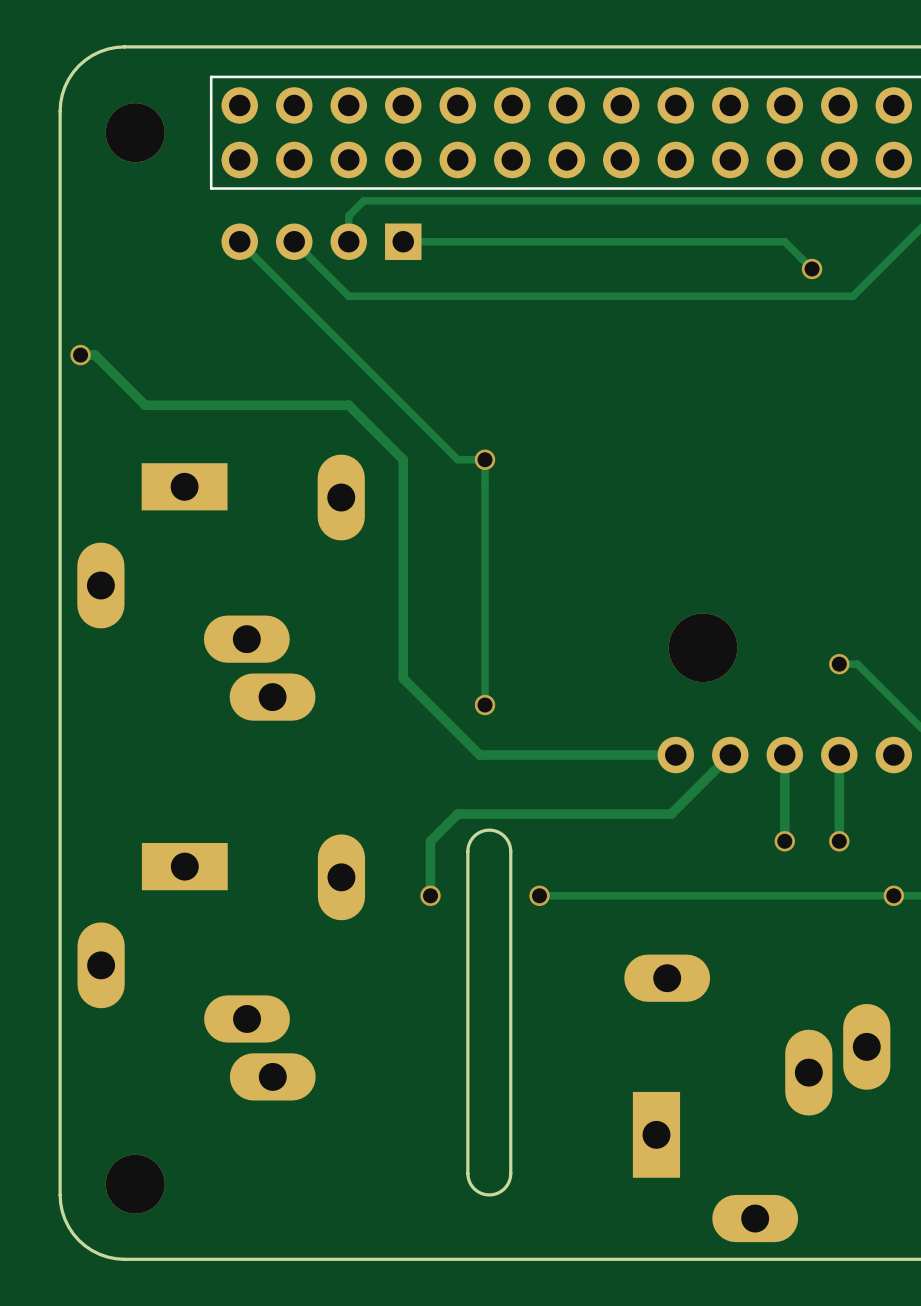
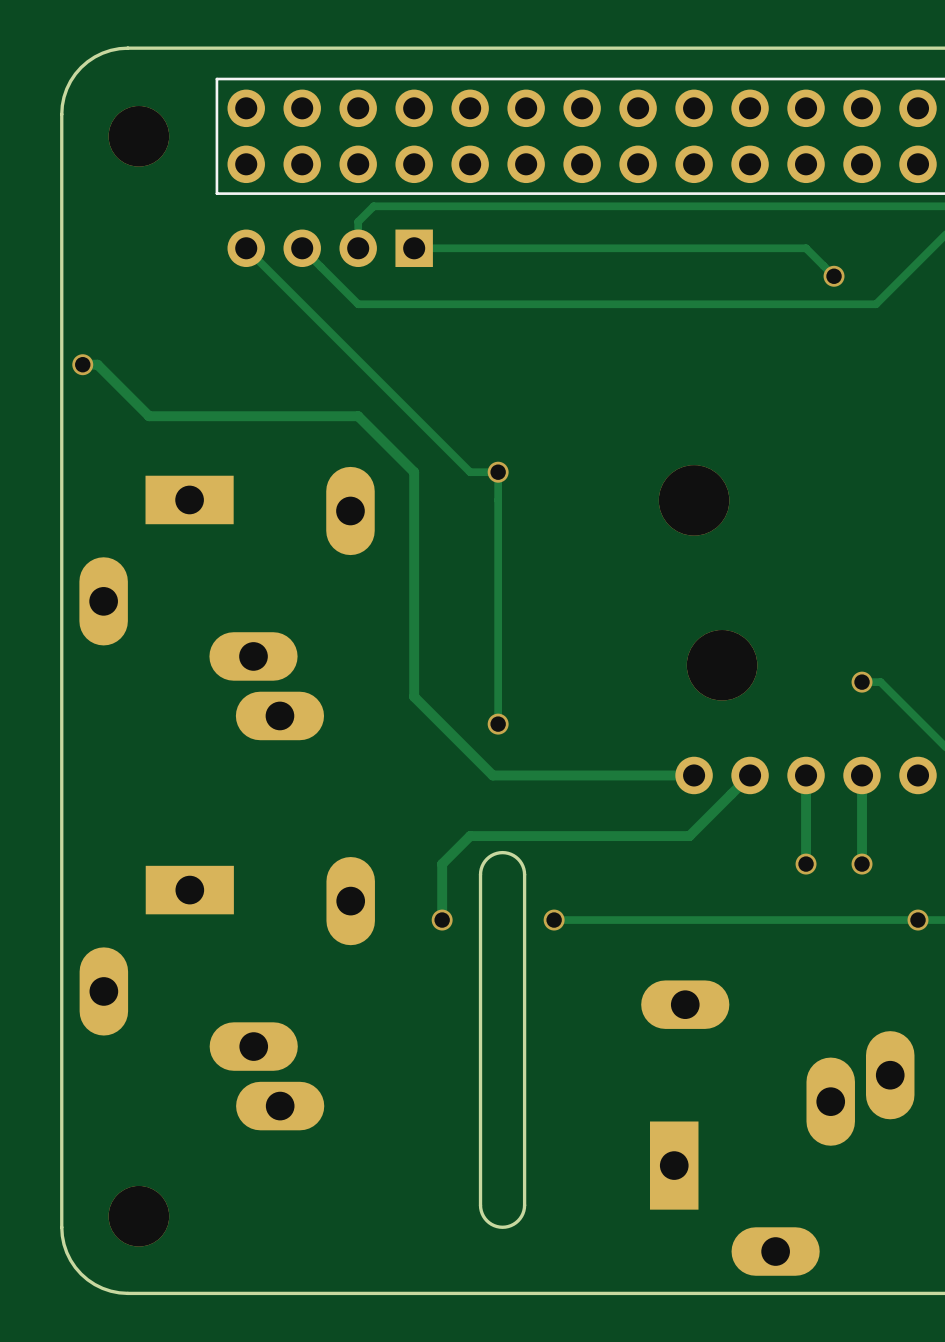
part: none -> (694, 500)

